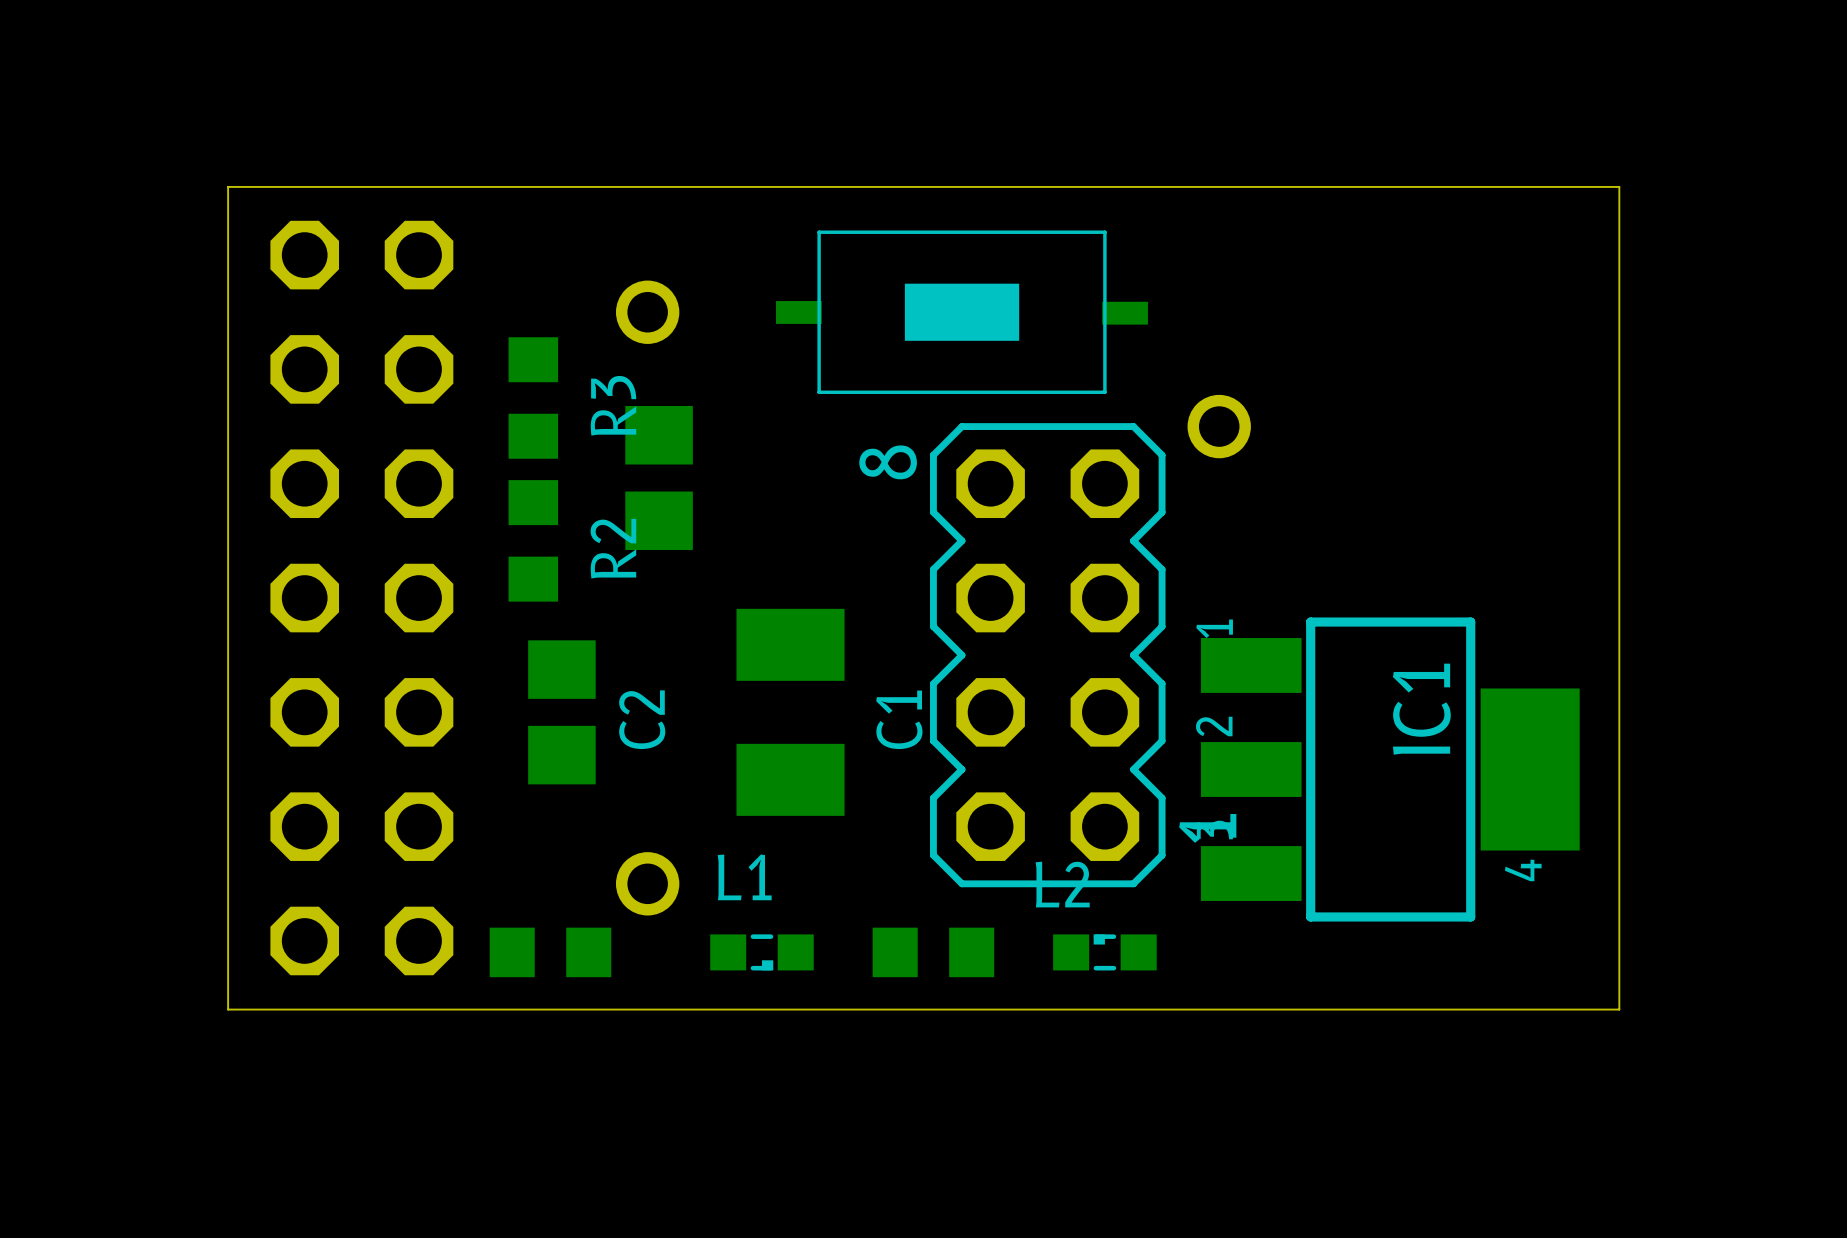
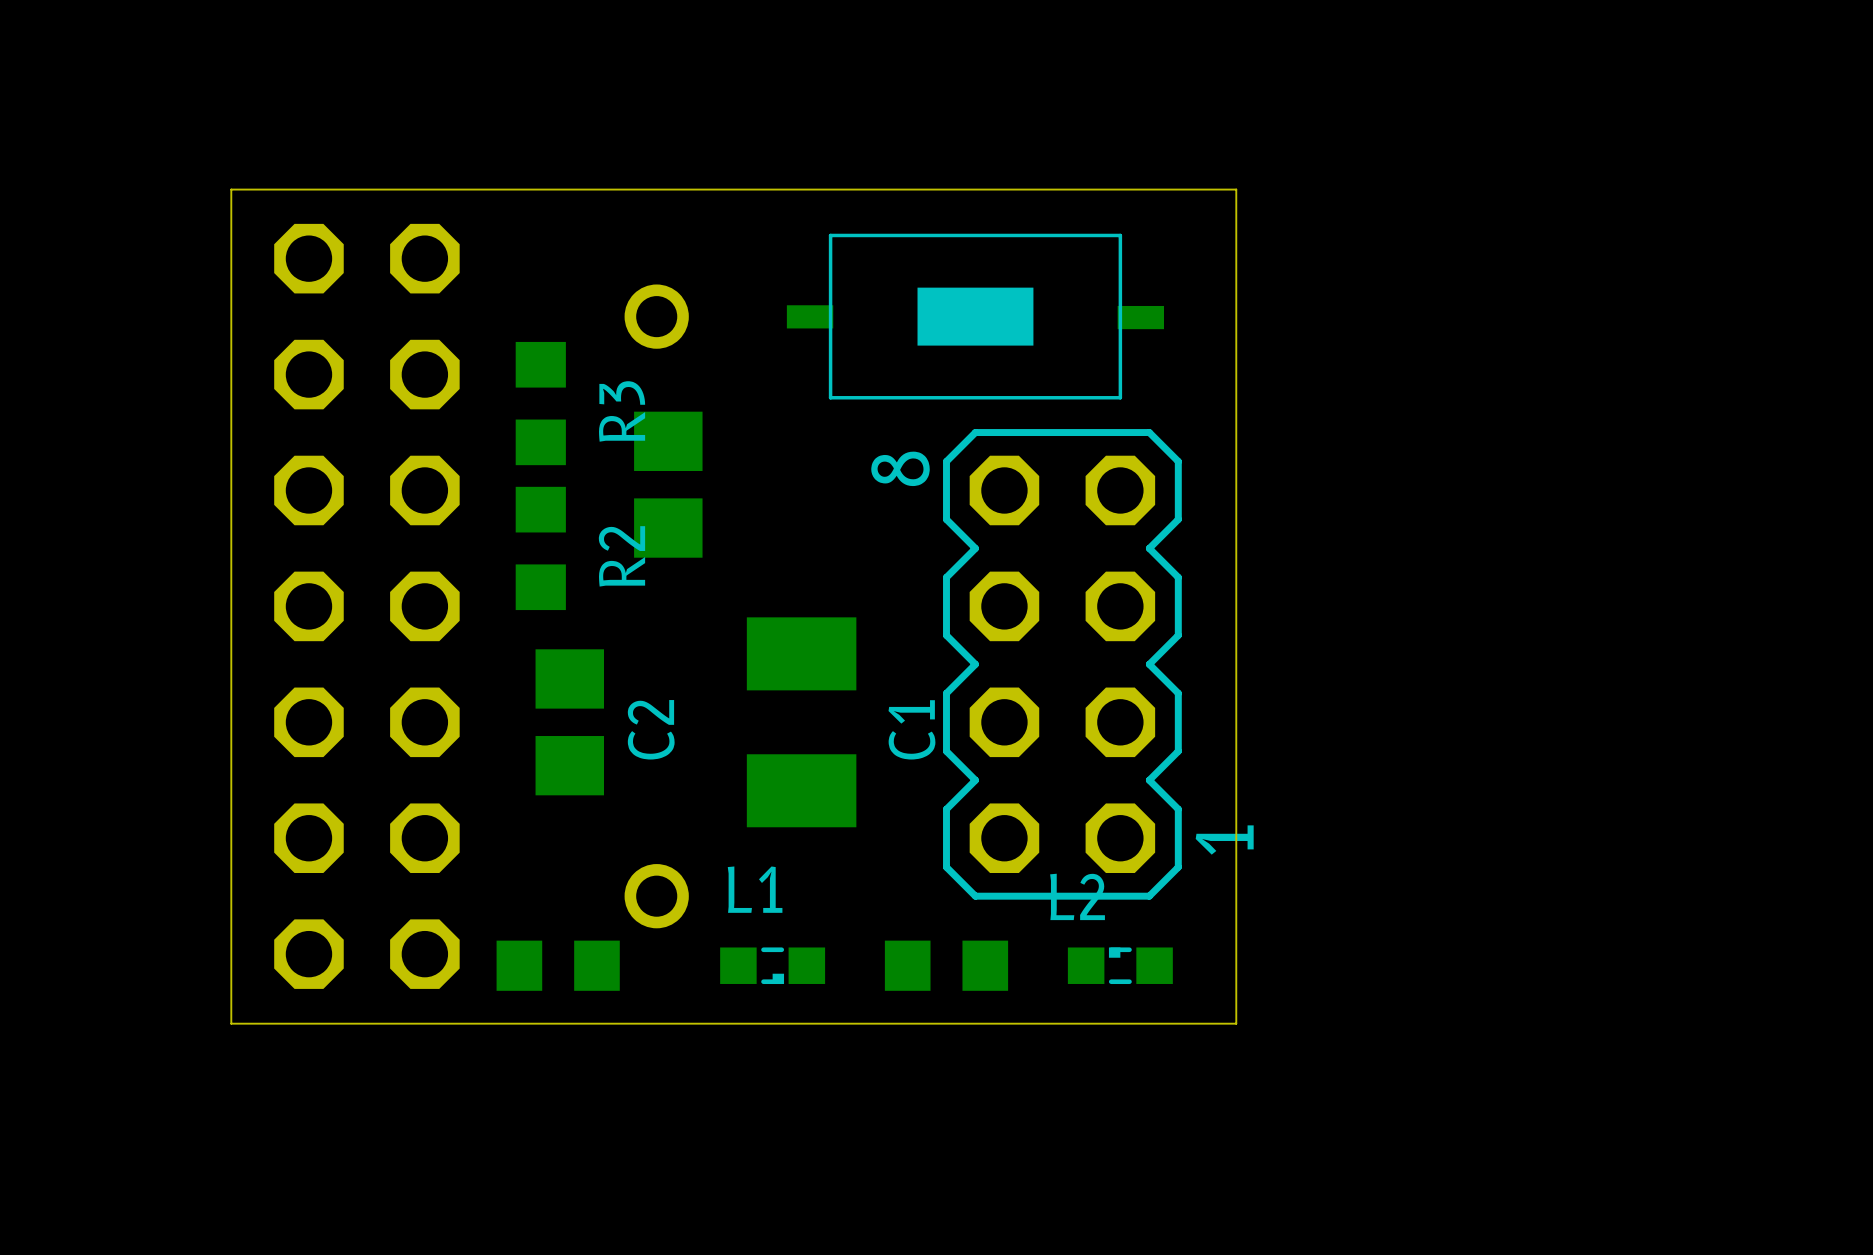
board edge: (1219, 186) (1619, 186) (1619, 1009) (1219, 1009) -> (1236, 189) (1236, 1023)
part: (1219, 426) -> none
IC1: (1390, 769) -> none

